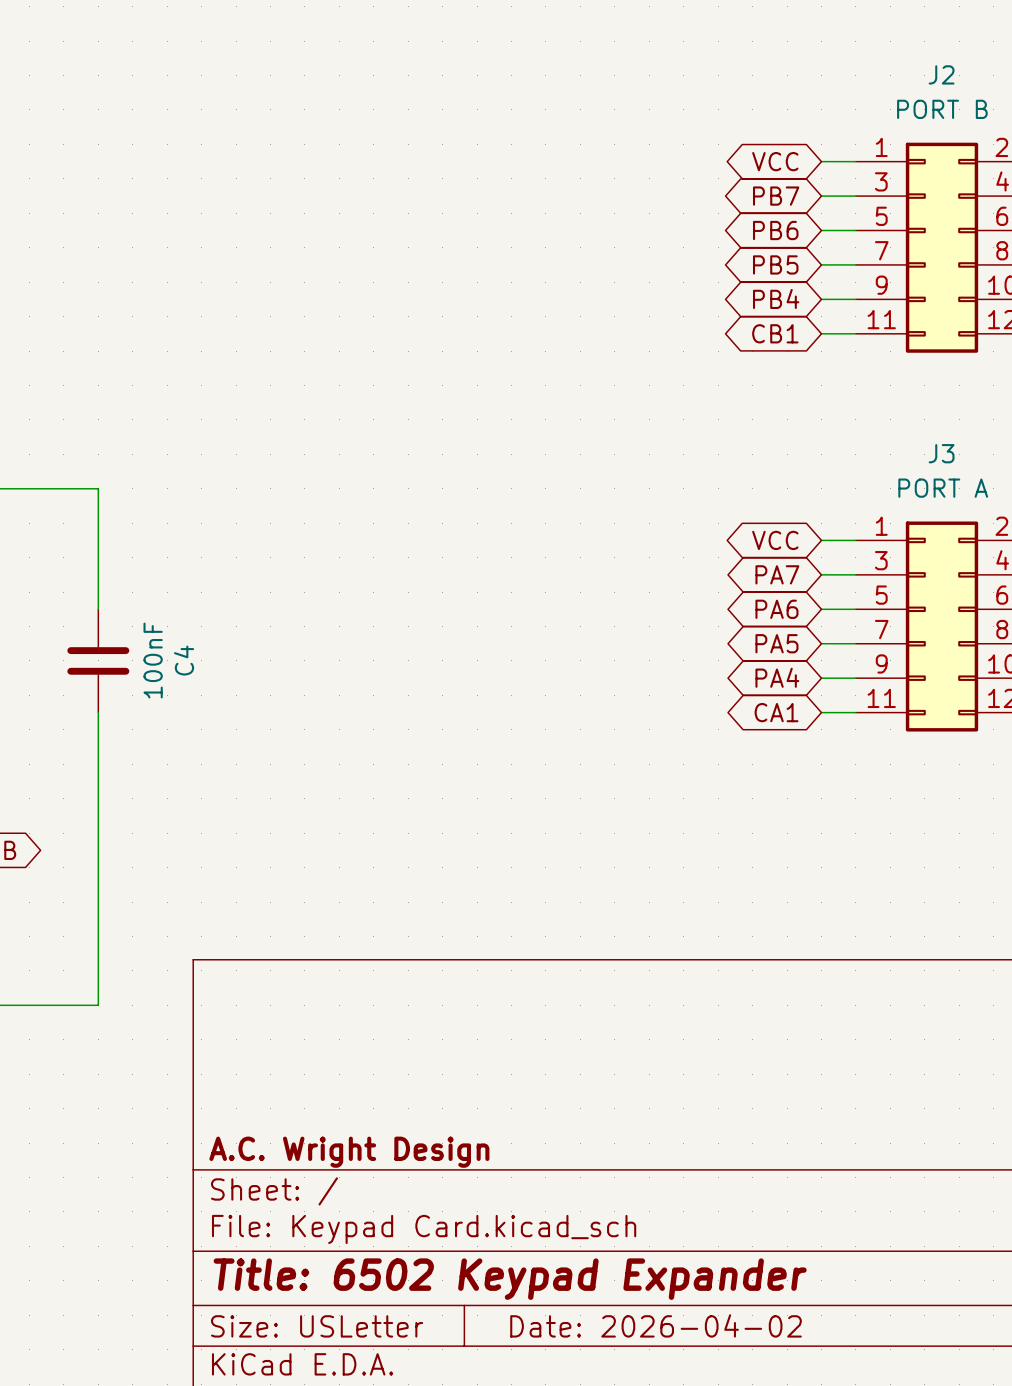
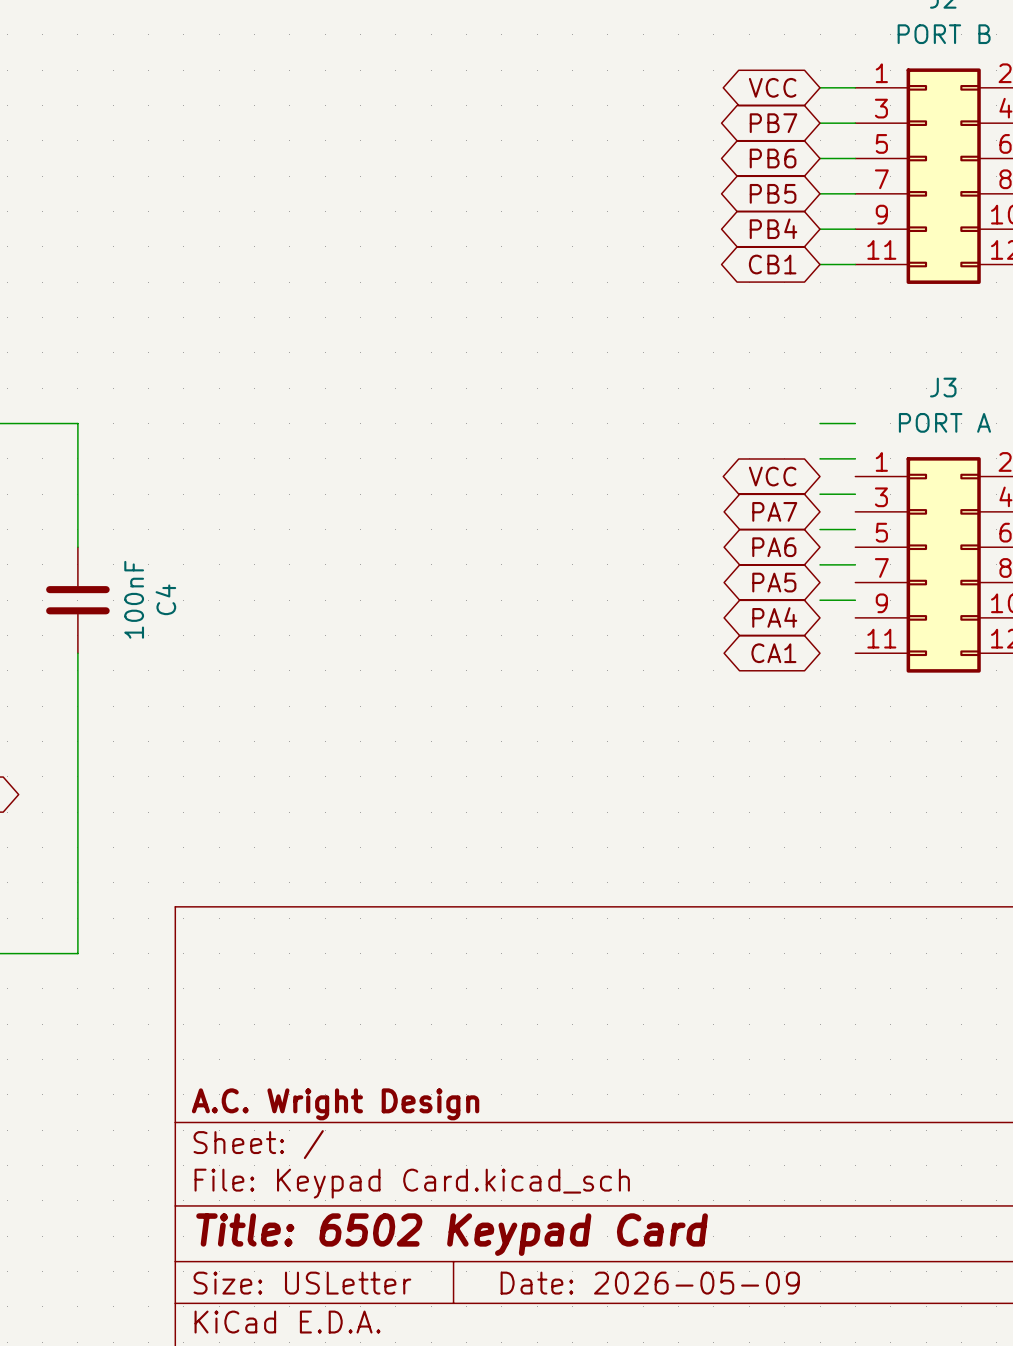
wire: (821, 540) (855, 540) -> (820, 423) (855, 423)
wire: (821, 574) (855, 574) -> (820, 458) (855, 458)
wire: (821, 609) (855, 609) -> (820, 494) (855, 494)
wire: (821, 643) (855, 643) -> (820, 529) (855, 529)
wire: (821, 678) (855, 678) -> (820, 564) (855, 564)
wire: (821, 712) (855, 712) -> (820, 600) (855, 600)
title block: Title: 6502 Keypad Expander (510, 1279) -> Title: 6502 Keypad Card (452, 1234)
title block: Date: 2026-04-02 (656, 1325) -> Date: 2026-05-09 (650, 1283)

